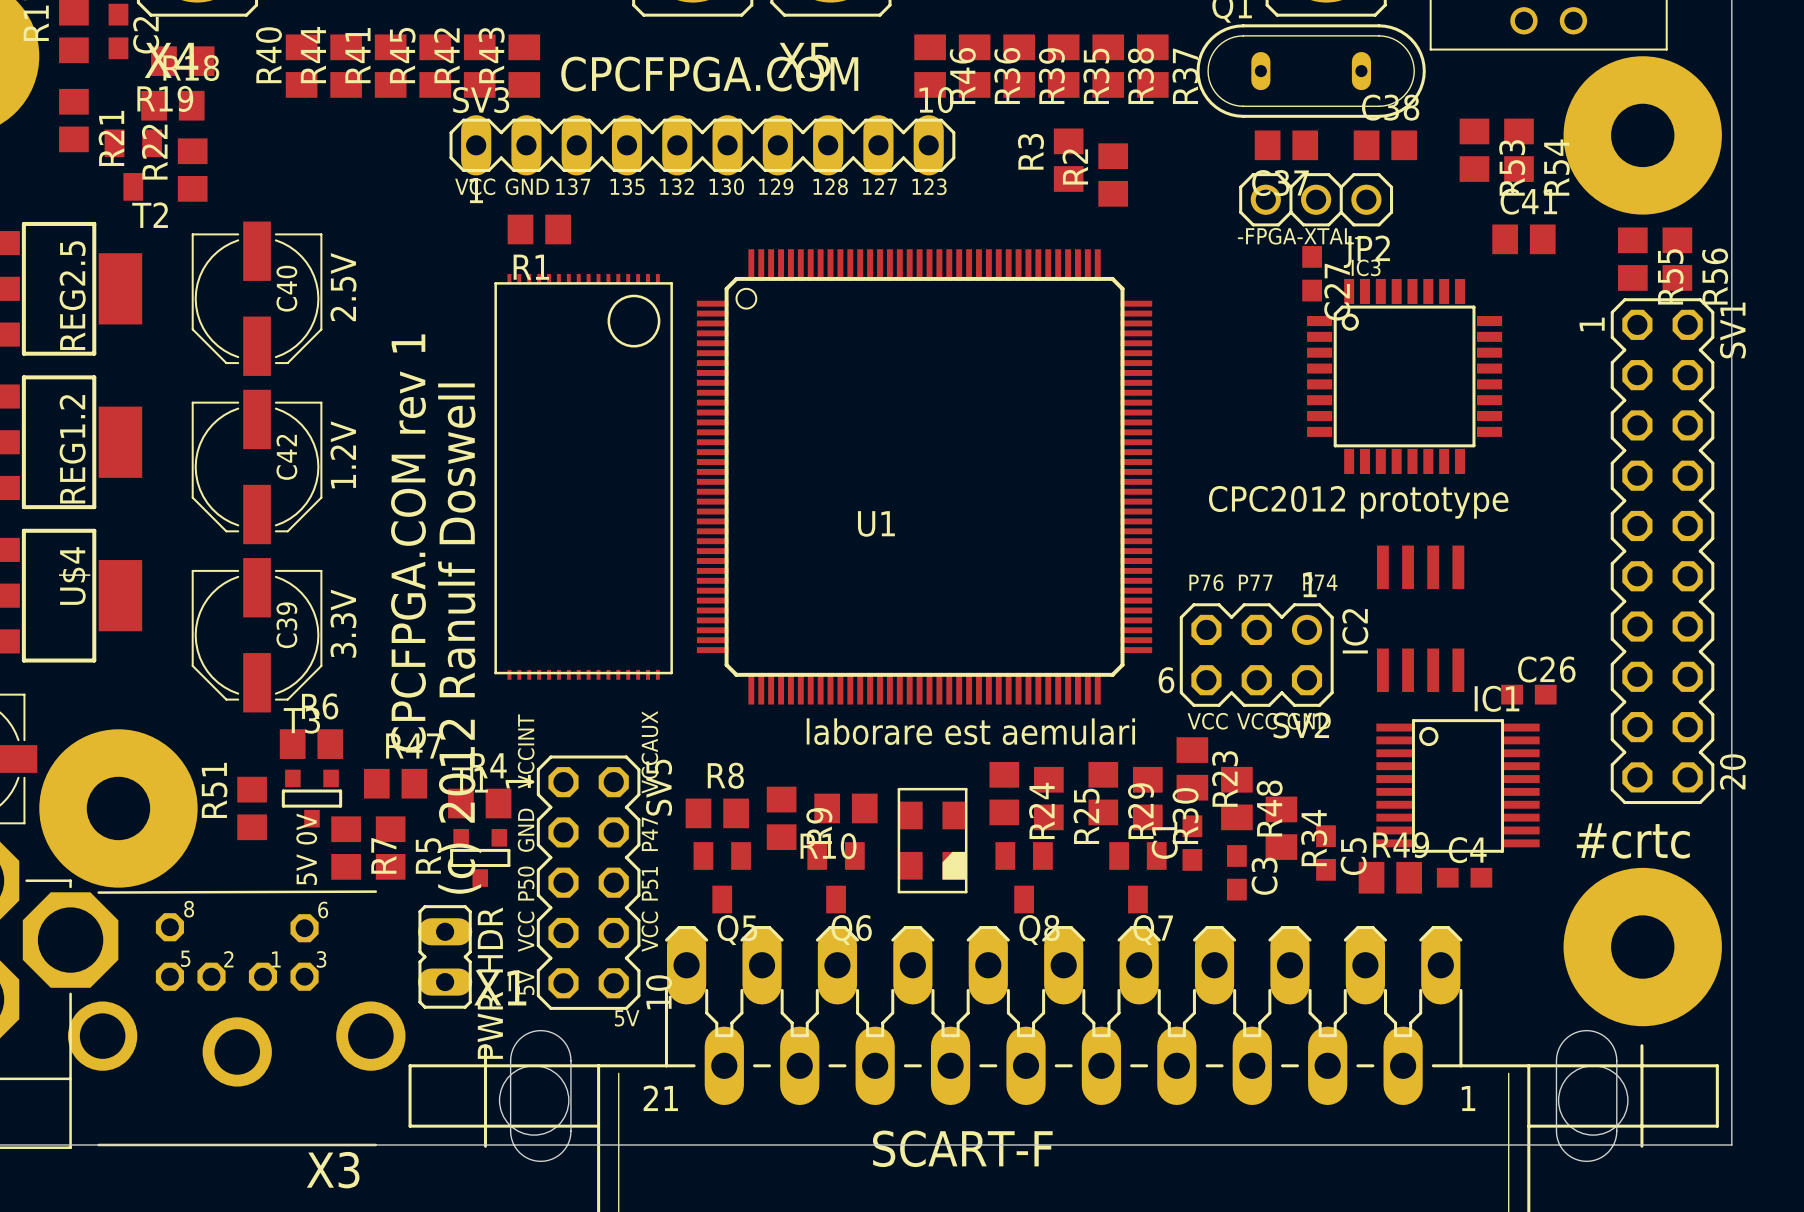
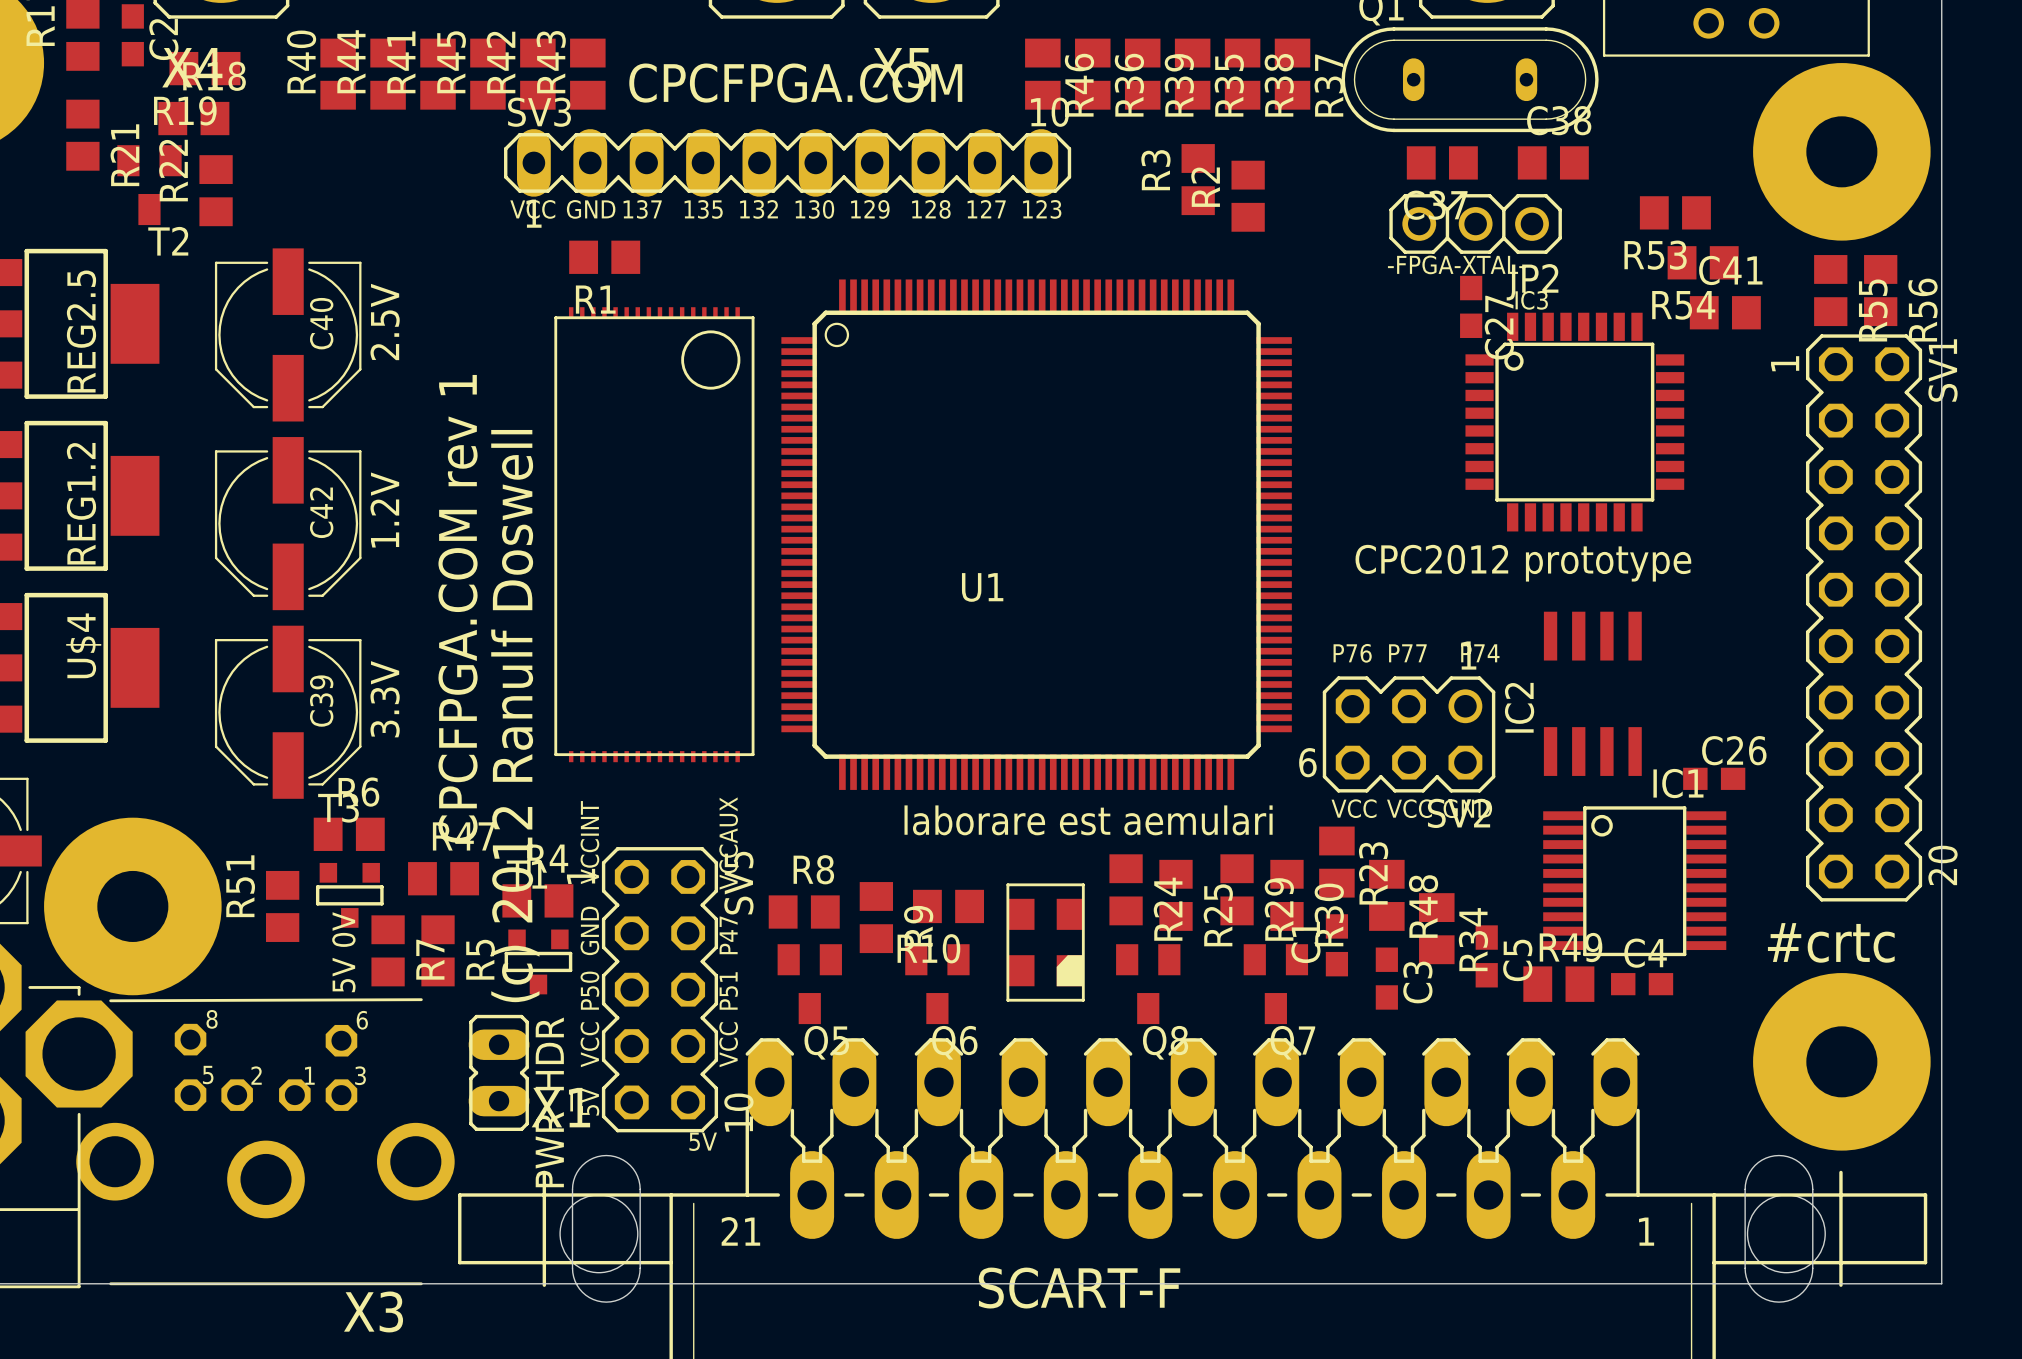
R53 rotation: 0° (1474, 150) -> 90° clockwise (1675, 212)
R53 position: (1474, 150) -> (1675, 212)
R54 rotation: 0° (1519, 150) -> 90° clockwise (1703, 262)
R54 position: (1519, 150) -> (1703, 262)
C41 position: (1523, 239) -> (1725, 312)

